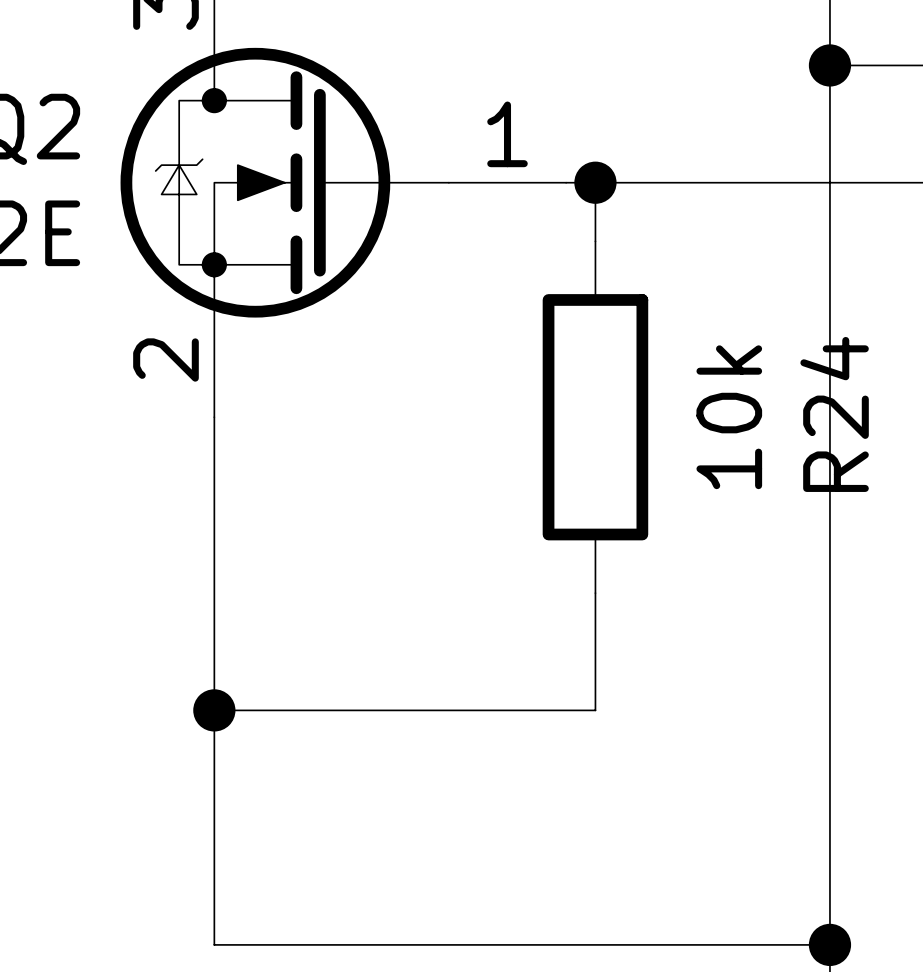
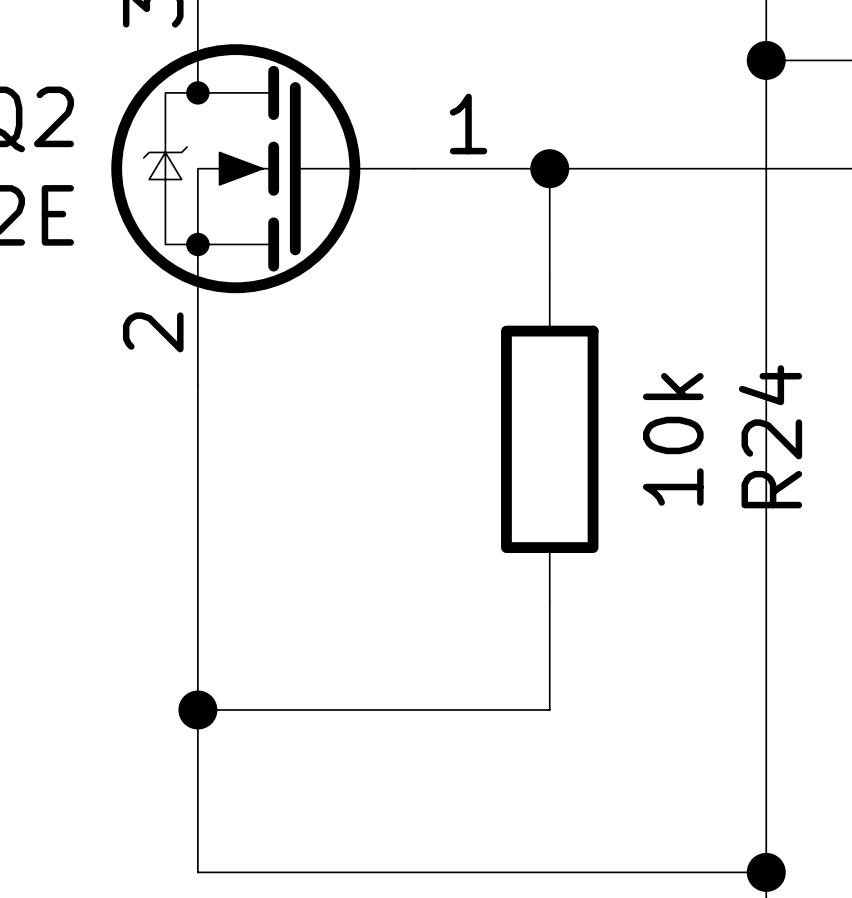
R24 position: (595, 417) -> (549, 439)
wire: (214, 710) (595, 710) -> (197, 709) (549, 709) (549, 655)
junction position: (214, 710) -> (197, 709)

